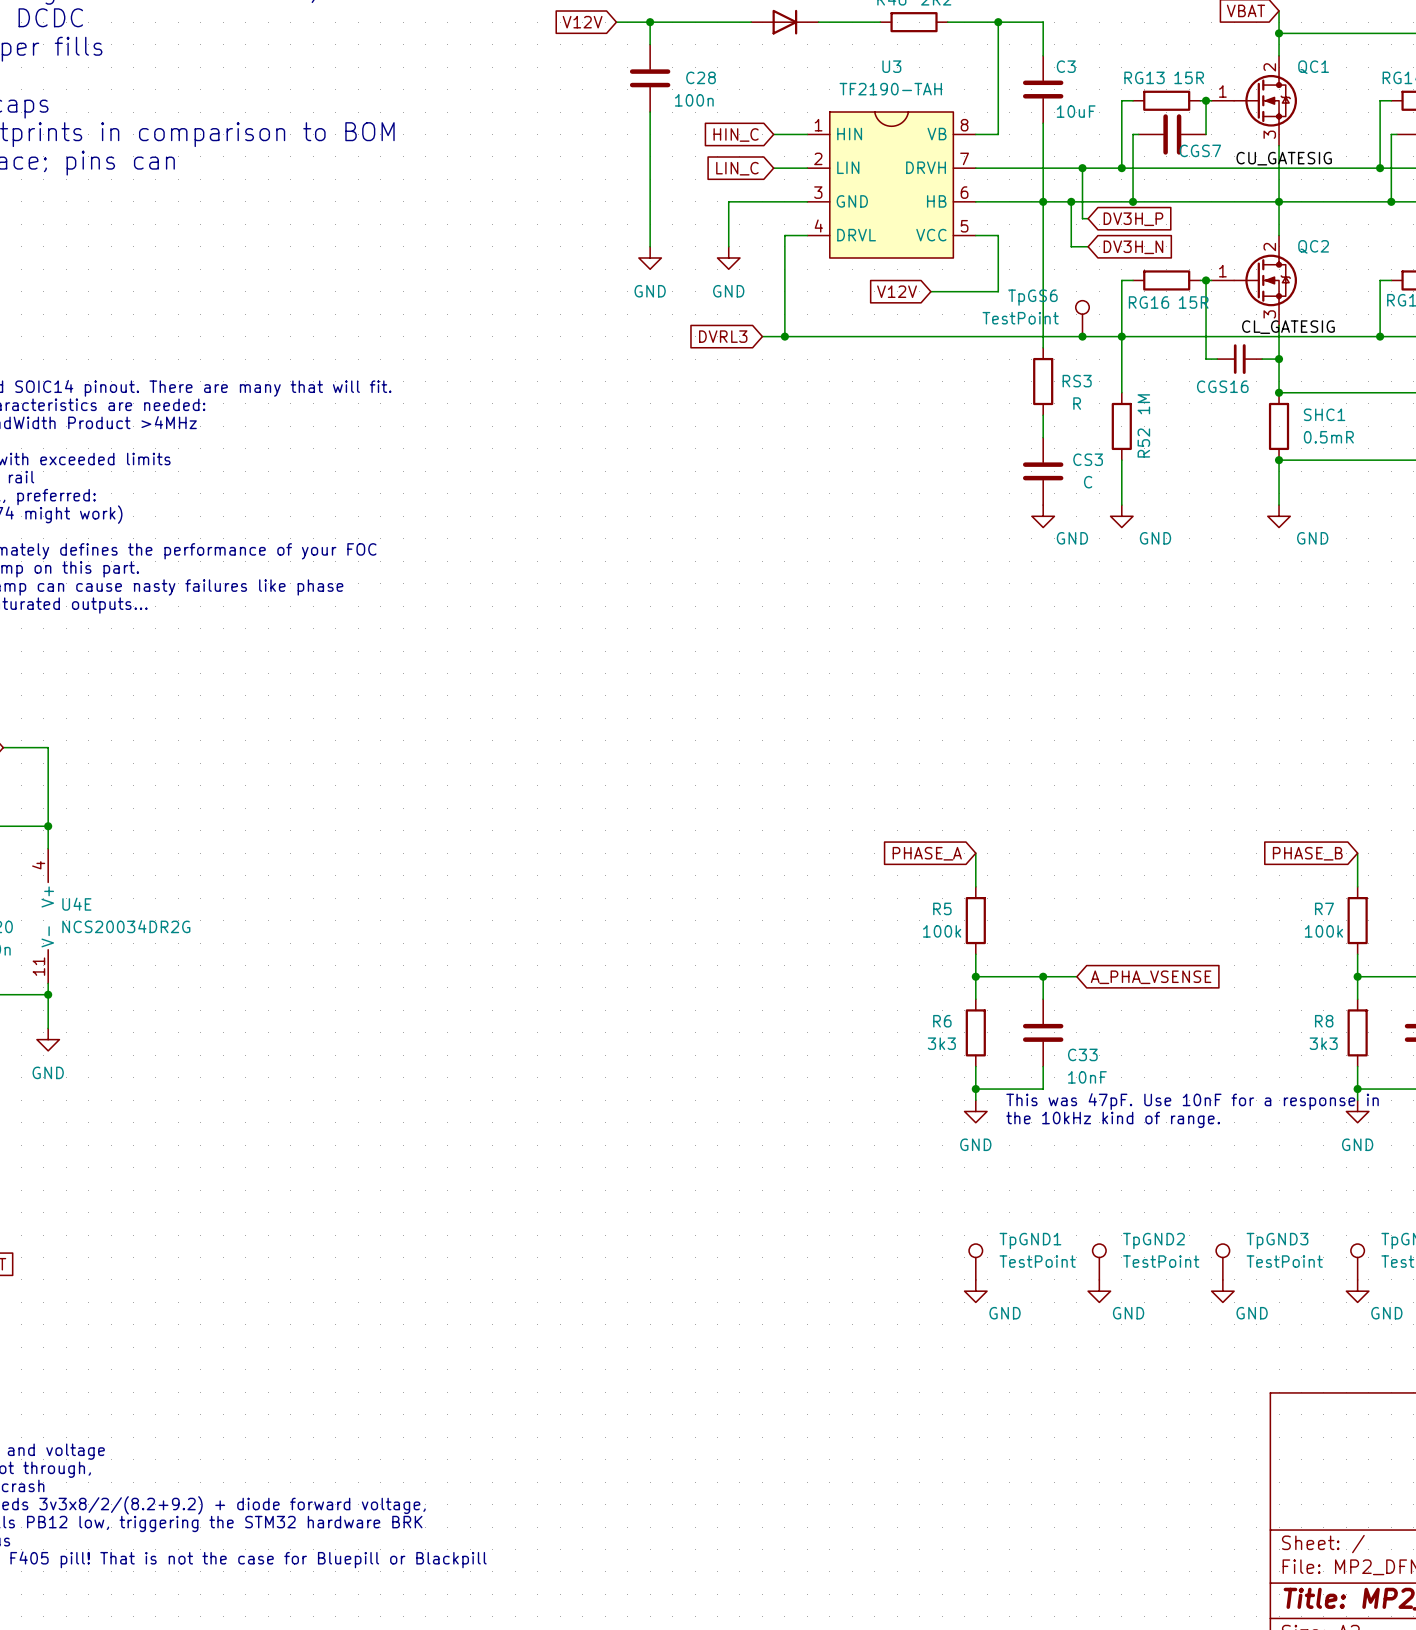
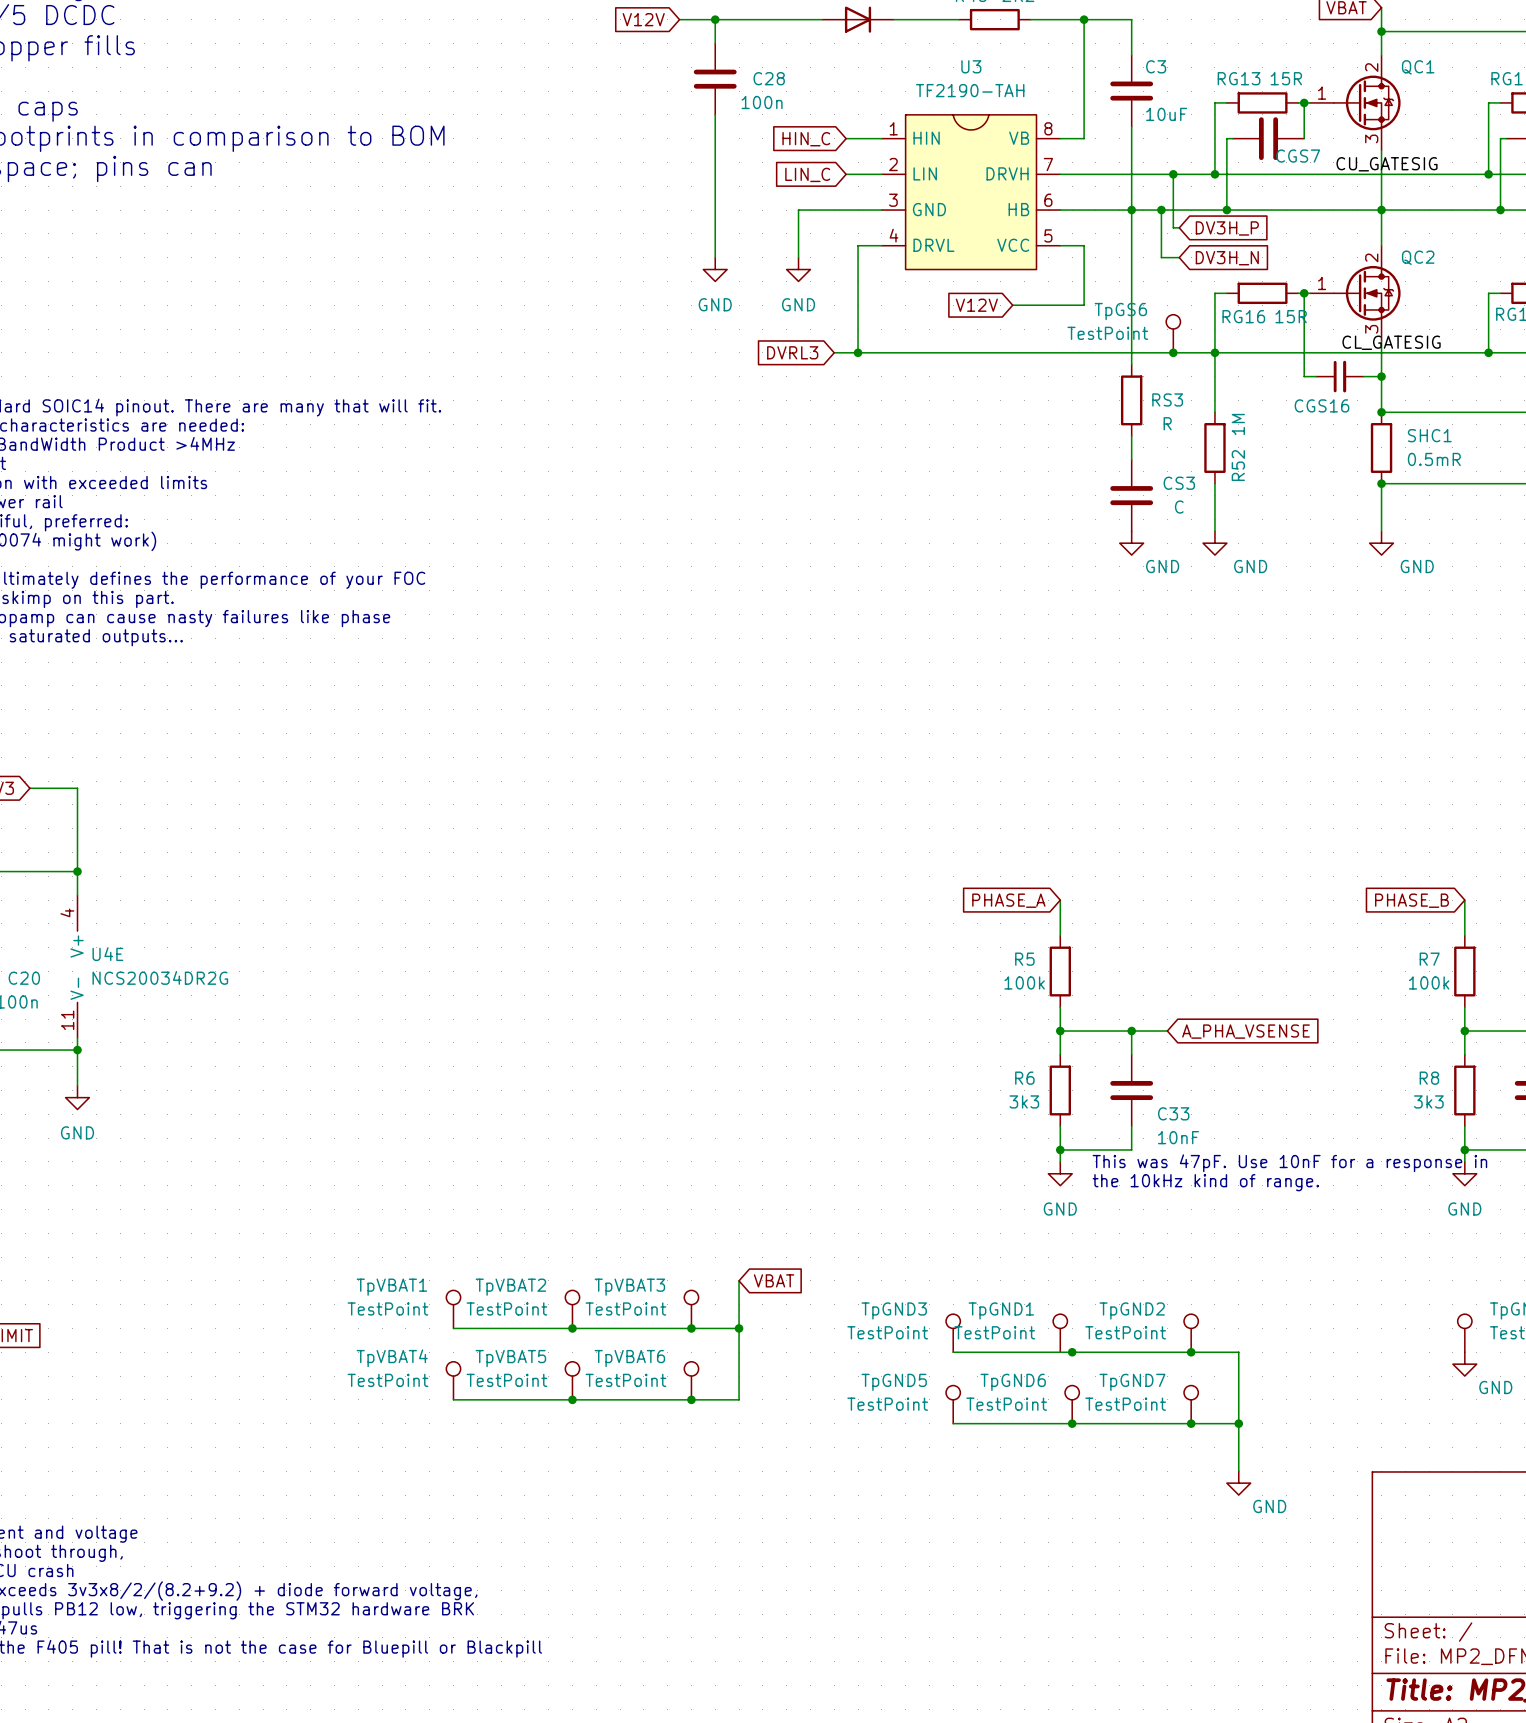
wire: none -> (739, 1280) (739, 1399) (453, 1399)
global label: none -> VBAT (774, 1280)
TpVBAT1: none -> TestPoint (453, 1309)
TpVBAT2: none -> TestPoint (572, 1309)
TpVBAT3: none -> TestPoint (691, 1309)
TpGND1 name position: TpGND1 (1030, 1240) -> TpGND1 (1001, 1310)
TpGND2 name position: TpGND2 (1153, 1240) -> TpGND2 (1132, 1310)
TpGND3 name position: TpGND3 (1277, 1240) -> TpGND3 (894, 1310)
wire: none -> (453, 1328) (739, 1328)
junction: none -> (572, 1328)
junction: none -> (691, 1328)
junction: none -> (739, 1328)
TpGND1 value position: TestPoint (1037, 1261) -> TestPoint (994, 1332)
TpGND2 value position: TestPoint (1161, 1261) -> TestPoint (1125, 1332)
TpGND3 position: (1222, 1261) -> (953, 1333)
TpGND3 value position: TestPoint (1284, 1261) -> TestPoint (887, 1332)
wire: none -> (953, 1352) (1238, 1352) (1238, 1471)
junction: none -> (1072, 1352)
junction: none -> (1191, 1352)
power symbol: GND (975, 1291) -> none
power symbol: GND (1099, 1291) -> none
power symbol: GND (1222, 1291) -> none
TpVBAT4: none -> TestPoint (453, 1380)
TpVBAT5: none -> TestPoint (572, 1380)
TpVBAT6: none -> TestPoint (691, 1380)
junction: none -> (572, 1399)
junction: none -> (691, 1399)
TpGND5: none -> TestPoint (953, 1404)
TpGND6: none -> TestPoint (1072, 1404)
TpGND7: none -> TestPoint (1191, 1404)
wire: none -> (953, 1423) (1238, 1423)
junction: none -> (1072, 1423)
junction: none -> (1191, 1423)
junction: none -> (1238, 1423)
power symbol: none -> GND (1238, 1483)

